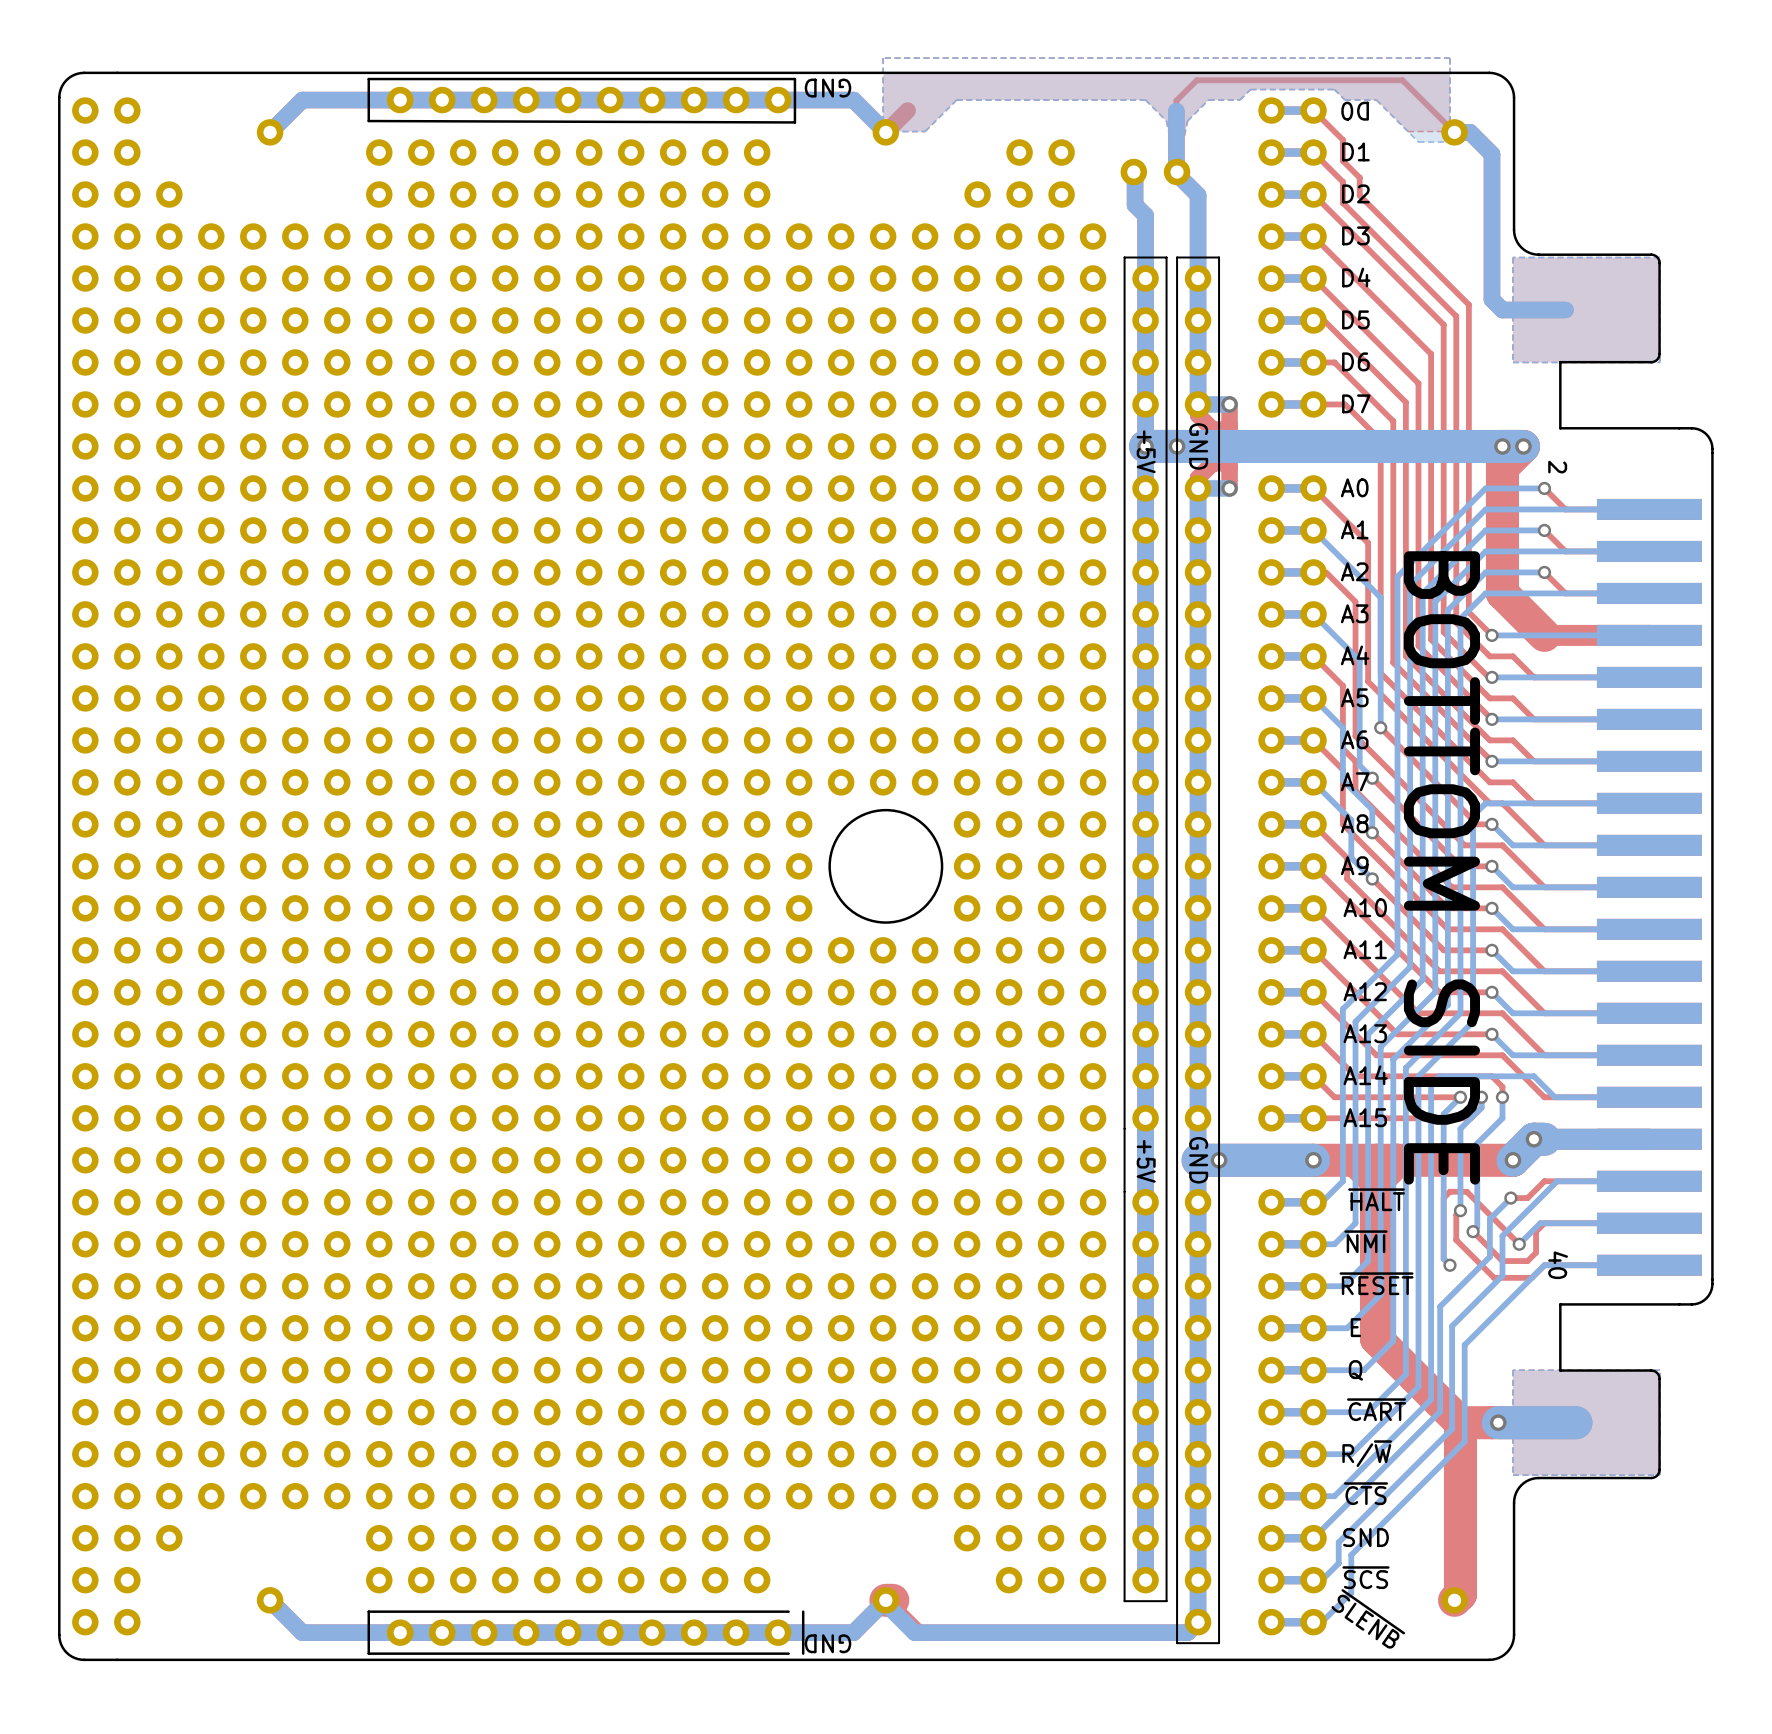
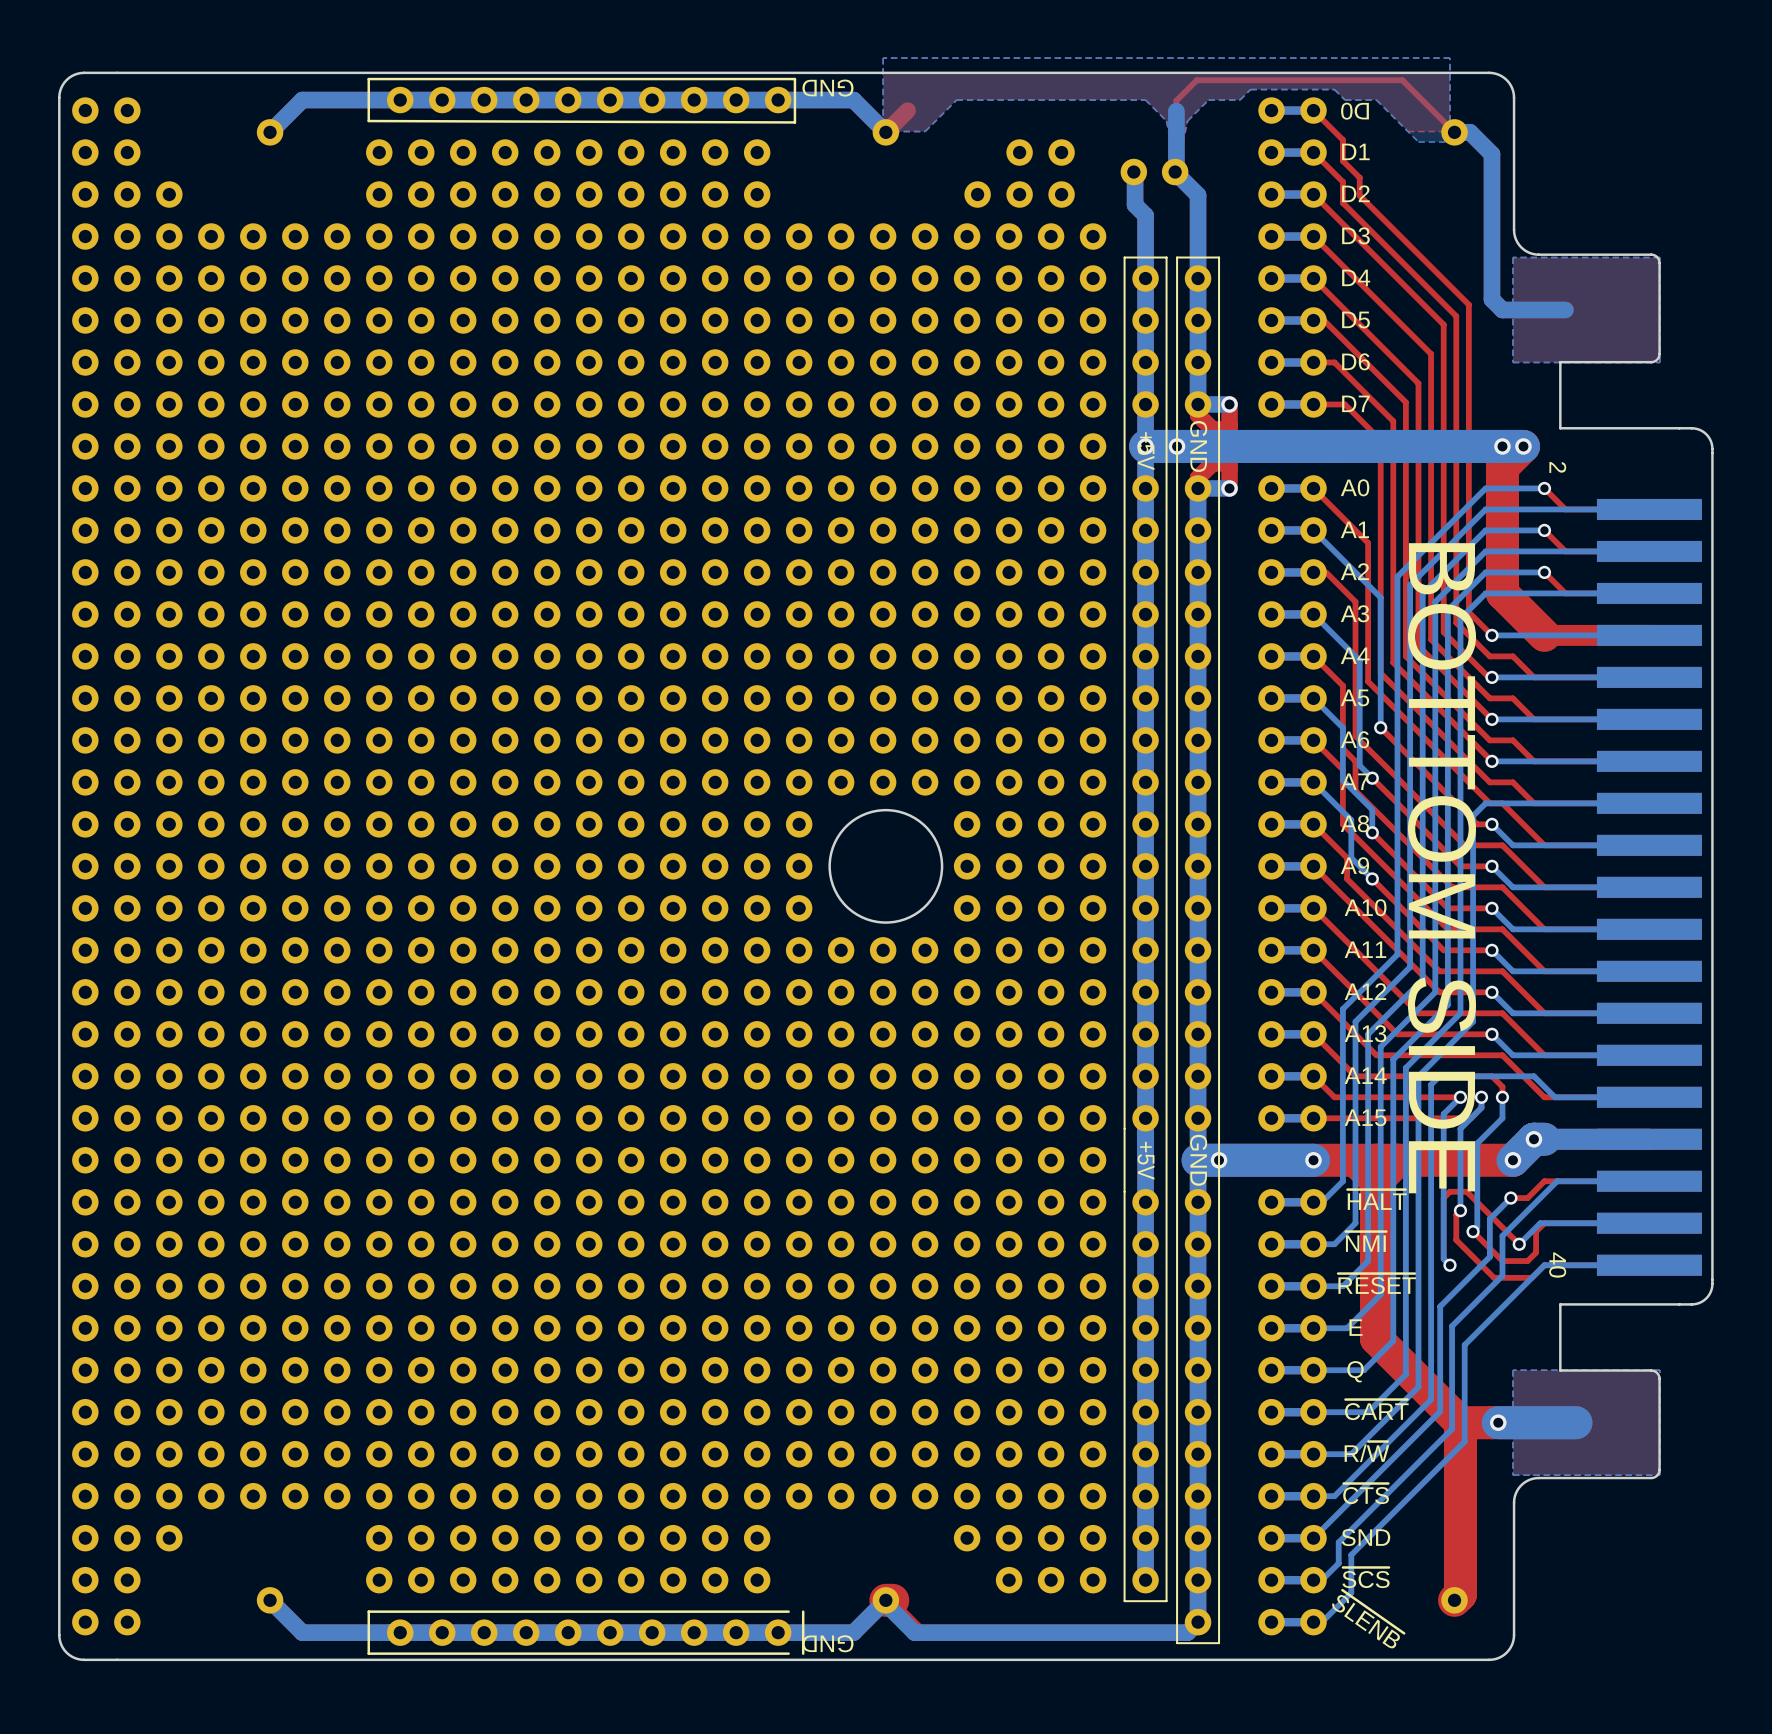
part: none -> (1154, 172)
part: (1177, 172) -> none

